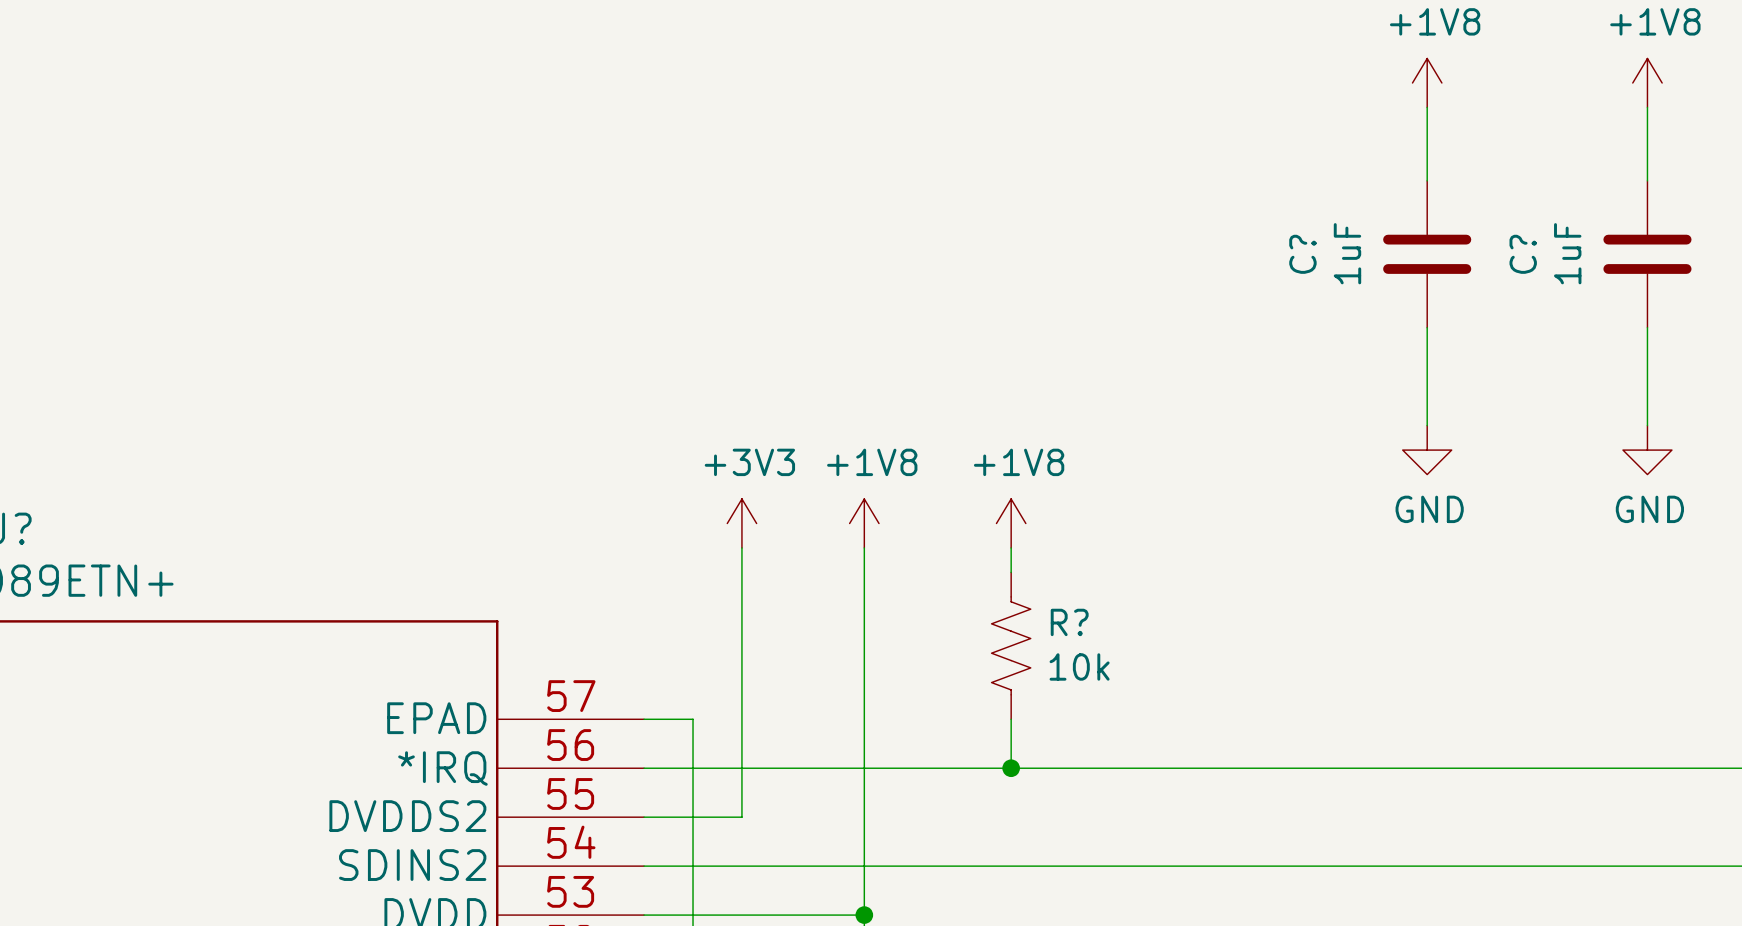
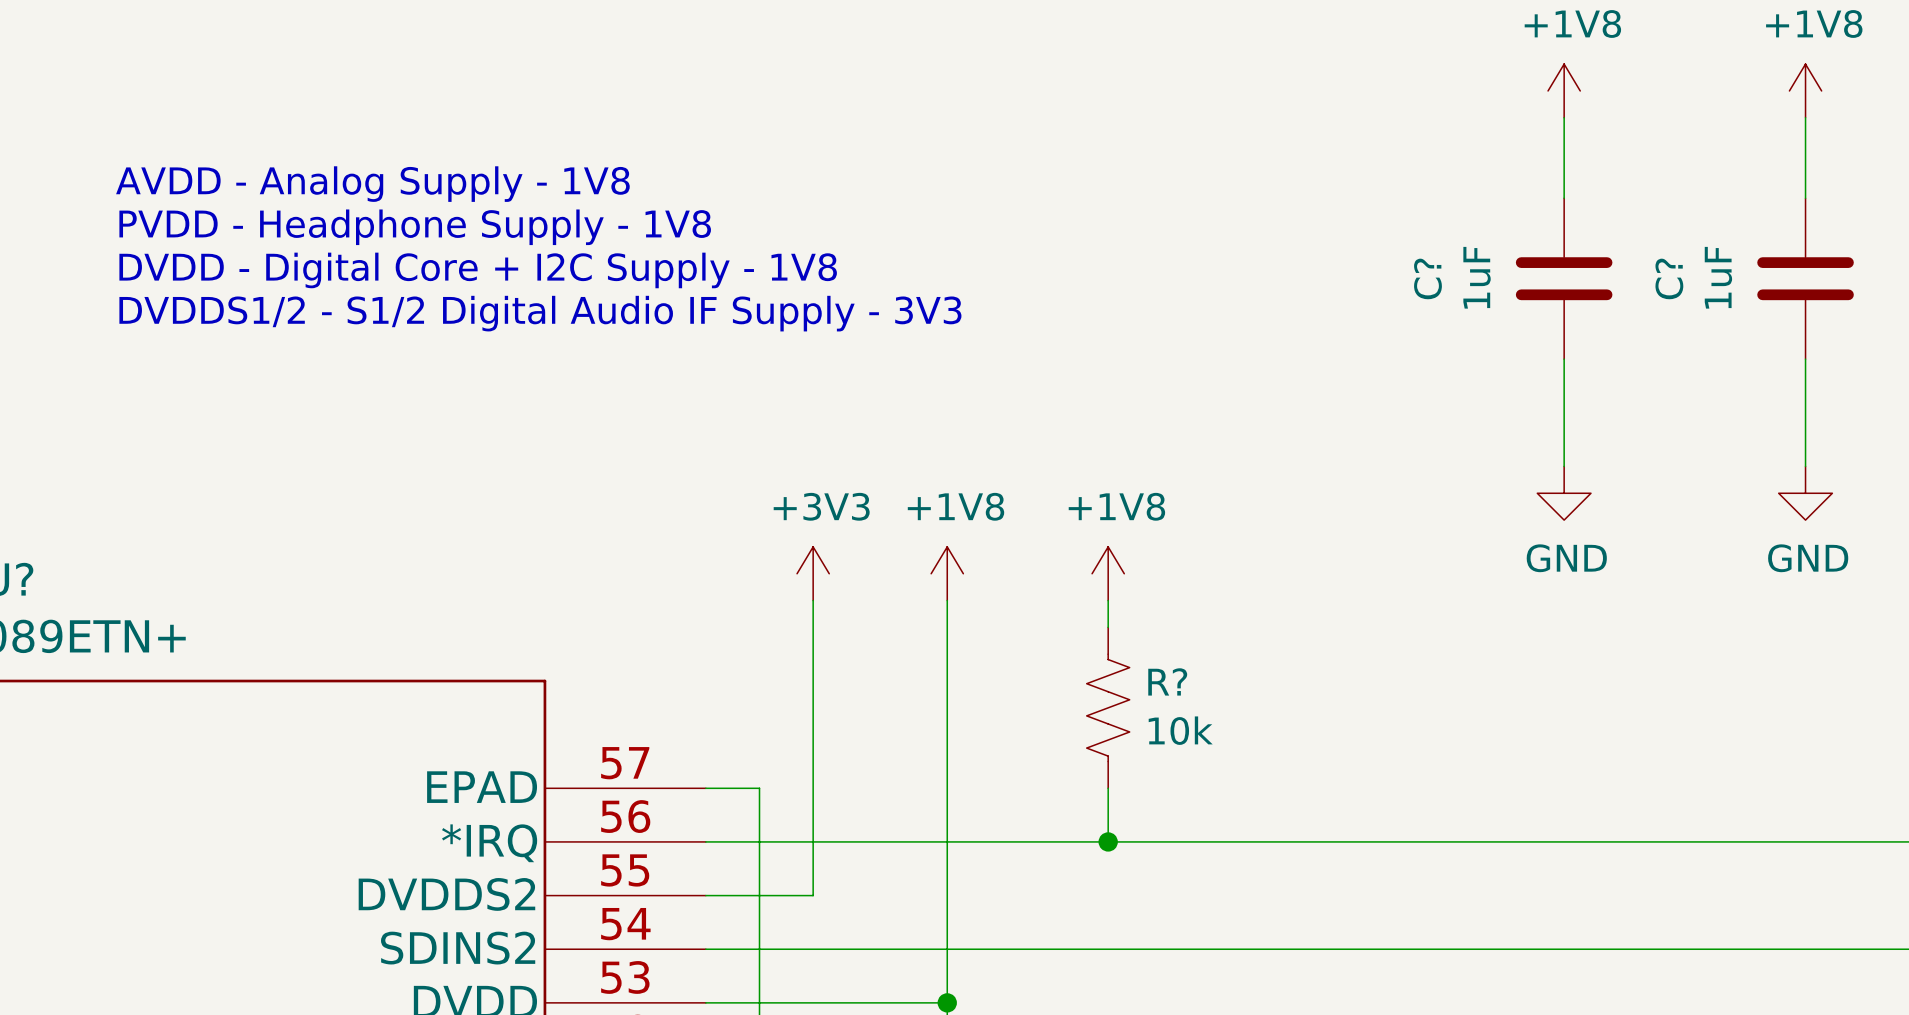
text: none -> AVDD - Analog Supply - 1V8 (372, 184)
text: none -> PVDD - Headphone Supply - 1V8 (415, 227)
text: none -> DVDD - Digital Core + I2C Supply - 1V8 (478, 270)
text: none -> DVDDS1/2 - S1/2 Digital Audio IF Supply - 3V3 (540, 313)

